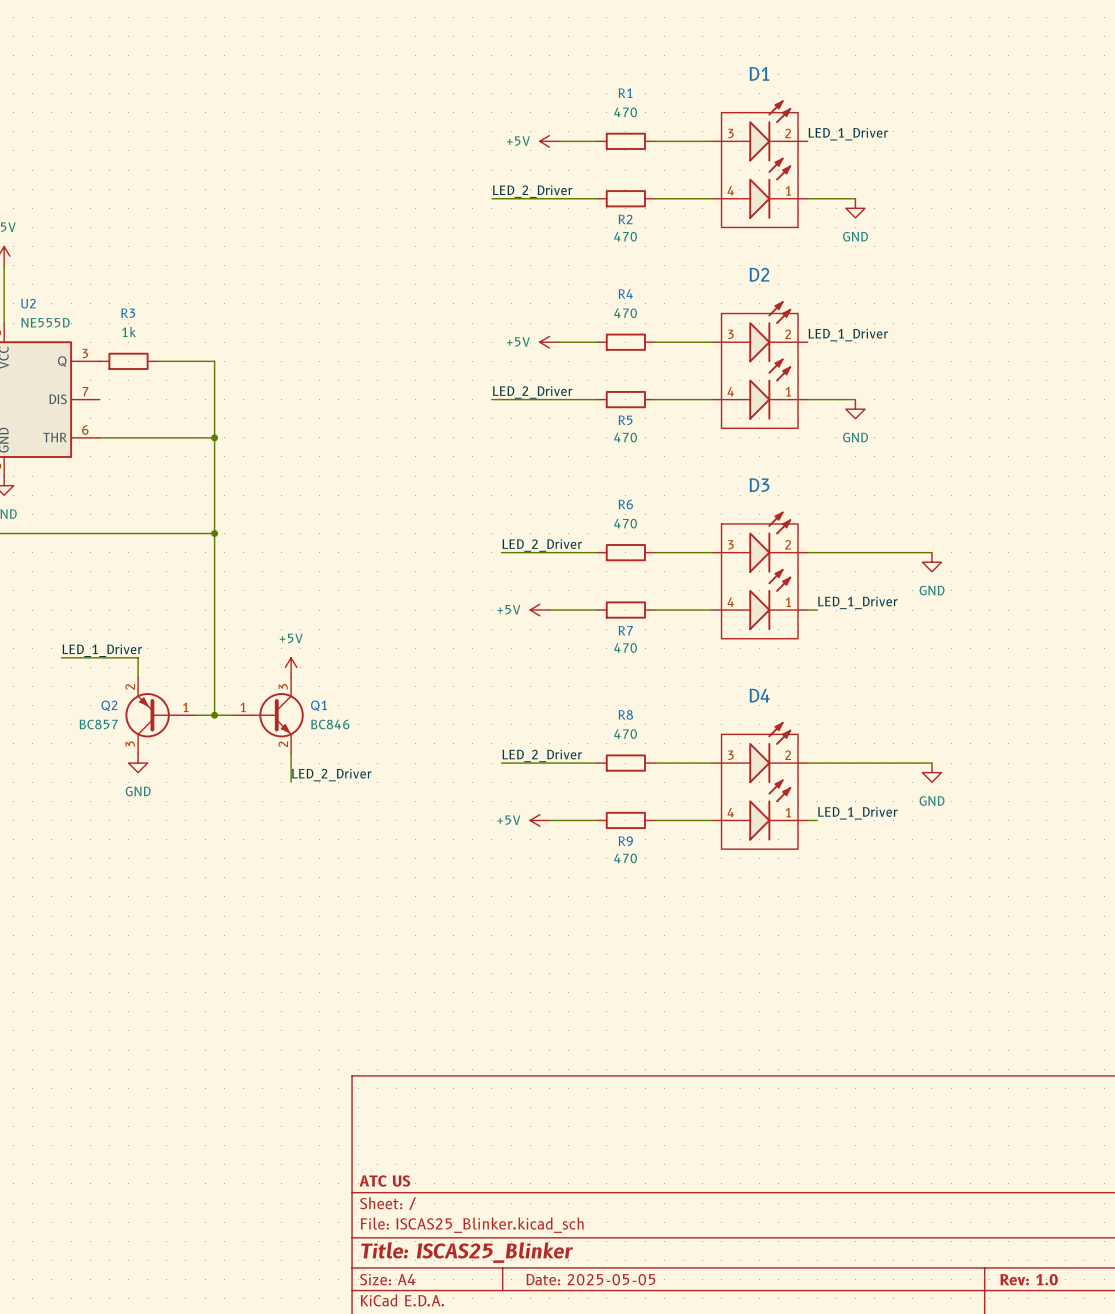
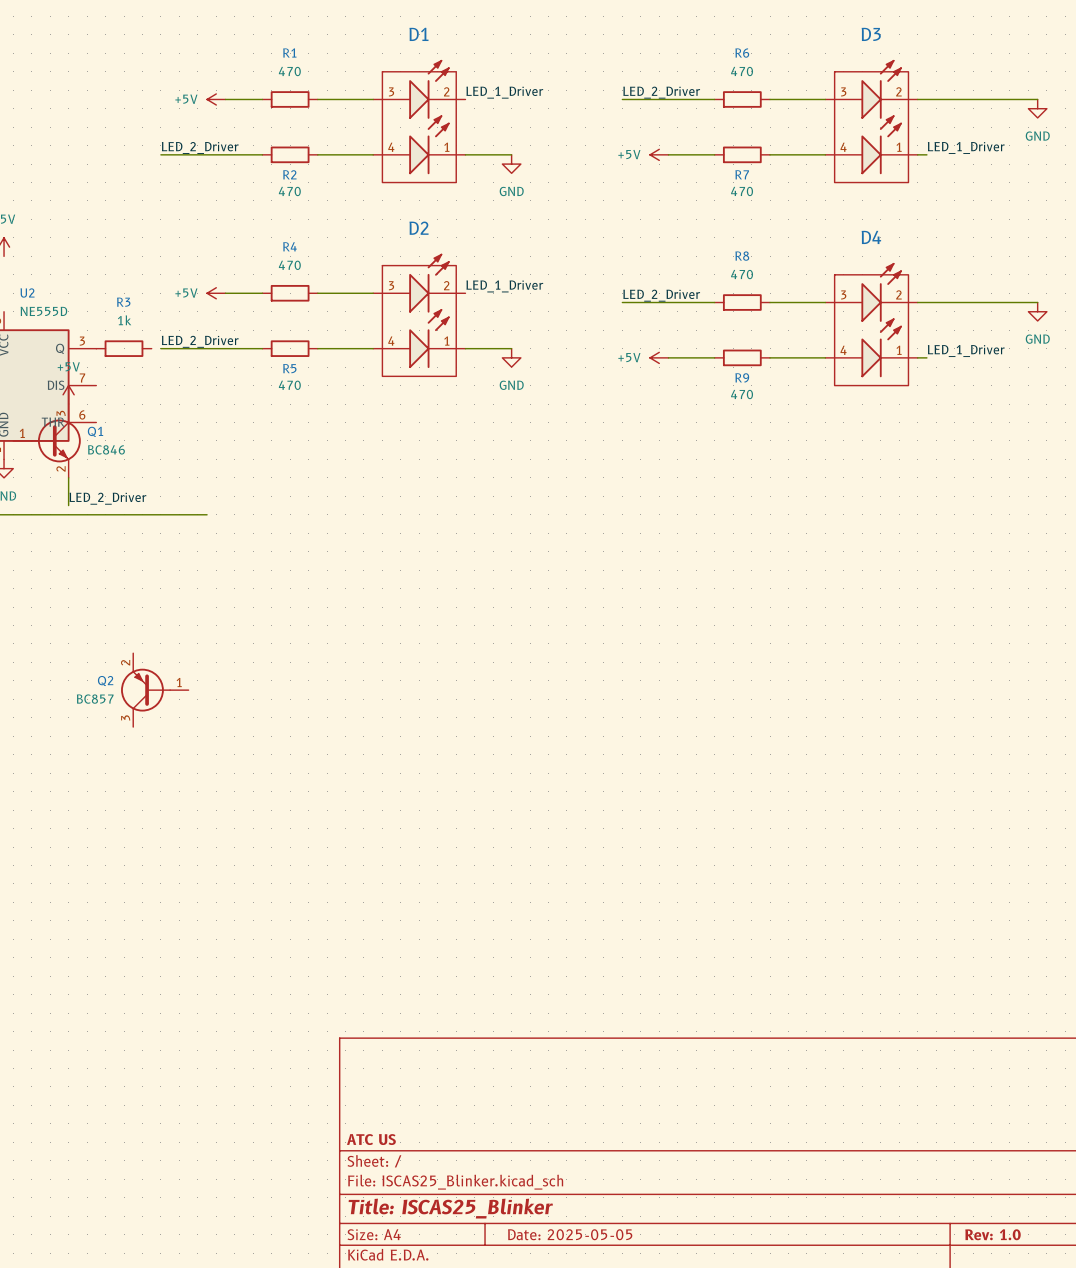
label: none -> LED_1_Driver (504, 92)
label: none -> LED_2_Driver (661, 92)
power symbol: none -> +5V (216, 99)
wire: none -> (225, 99) (262, 99)
wire: none -> (317, 99) (373, 99)
wire: none -> (622, 99) (714, 99)
wire: none -> (917, 99) (1037, 99)
power symbol: none -> GND (1037, 108)
label: LED_1_Driver (848, 134) -> none
power symbol: +5V (549, 141) -> none
wire: (558, 141) (597, 141) -> none
R1 position: (625, 141) -> (290, 99)
wire: (654, 141) (711, 141) -> (770, 99) (825, 99)
label: none -> LED_2_Driver (200, 147)
label: none -> LED_1_Driver (966, 147)
wire: none -> (160, 154) (262, 154)
wire: none -> (317, 154) (373, 154)
wire: none -> (465, 154) (511, 154)
power symbol: none -> +5V (659, 154)
wire: none -> (917, 154) (926, 154)
D1 position: (759, 163) -> (419, 121)
power symbol: none -> GND (511, 164)
label: LED_2_Driver (532, 191) -> none
wire: (491, 198) (597, 198) -> none
R2 position: (625, 198) -> (290, 154)
wire: (654, 198) (711, 198) -> (770, 154) (825, 154)
wire: (807, 198) (855, 198) -> (668, 154) (714, 154)
power symbol: GND (855, 208) -> none
wire: (4, 265) (4, 323) -> none
label: none -> LED_1_Driver (504, 286)
power symbol: none -> +5V (216, 293)
wire: none -> (225, 293) (262, 293)
wire: none -> (317, 293) (373, 293)
label: none -> LED_2_Driver (661, 295)
wire: none -> (622, 302) (714, 302)
wire: none -> (917, 302) (1037, 302)
power symbol: none -> GND (1037, 311)
label: LED_1_Driver (848, 335) -> none
power symbol: +5V (549, 342) -> none
wire: (558, 342) (597, 342) -> none
R4 position: (625, 342) -> (290, 293)
wire: (654, 342) (711, 342) -> (770, 302) (825, 302)
label: none -> LED_2_Driver (200, 341)
wire: (157, 361) (166, 361) -> none
wire: (214, 361) (214, 715) -> (207, 348) (262, 348)
wire: none -> (317, 348) (373, 348)
wire: none -> (465, 348) (511, 348)
label: none -> LED_1_Driver (966, 351)
D2 position: (759, 364) -> (419, 314)
power symbol: none -> GND (511, 357)
power symbol: none -> +5V (659, 357)
wire: none -> (917, 357) (926, 357)
label: LED_2_Driver (532, 392) -> none
wire: (491, 399) (597, 399) -> none
R5 position: (625, 399) -> (290, 348)
wire: (654, 399) (711, 399) -> (770, 357) (825, 357)
wire: (807, 399) (855, 399) -> (668, 357) (714, 357)
power symbol: none -> +5V (68, 394)
power symbol: GND (855, 409) -> none
wire: (99, 437) (214, 437) -> none
junction: (214, 437) -> none
wire: none -> (68, 477) (68, 505)
label: none -> LED_2_Driver (107, 498)
junction: (214, 533) -> none
label: LED_2_Driver (542, 545) -> none
wire: (501, 552) (597, 552) -> none
R6 position: (625, 552) -> (742, 99)
wire: (654, 552) (711, 552) -> none
wire: (807, 552) (931, 552) -> none
power symbol: GND (931, 562) -> none
D3 position: (759, 575) -> (871, 121)
label: LED_1_Driver (857, 602) -> none
power symbol: +5V (539, 610) -> none
wire: (549, 610) (597, 610) -> none
R7 position: (625, 610) -> (742, 154)
wire: (654, 610) (711, 610) -> none
wire: (807, 610) (817, 610) -> none
label: LED_1_Driver (102, 650) -> none
wire: (61, 657) (138, 657) (138, 676) -> none
power symbol: +5V (291, 667) -> none
wire: (195, 715) (233, 715) -> none
junction: (214, 715) -> none
Q1 position: (268, 715) -> (47, 440)
wire: (291, 753) (291, 782) -> none
label: LED_2_Driver (542, 755) -> none
power symbol: GND (138, 763) -> none
wire: (501, 763) (597, 763) -> none
R8 position: (625, 763) -> (742, 302)
wire: (654, 763) (711, 763) -> none
wire: (807, 763) (931, 763) -> none
power symbol: GND (931, 772) -> none
label: LED_2_Driver (331, 775) -> none
D4 position: (759, 785) -> (871, 324)
label: LED_1_Driver (857, 813) -> none
power symbol: +5V (539, 820) -> none
wire: (549, 820) (597, 820) -> none
R9 position: (625, 820) -> (742, 357)
wire: (654, 820) (711, 820) -> none
wire: (807, 820) (817, 820) -> none

